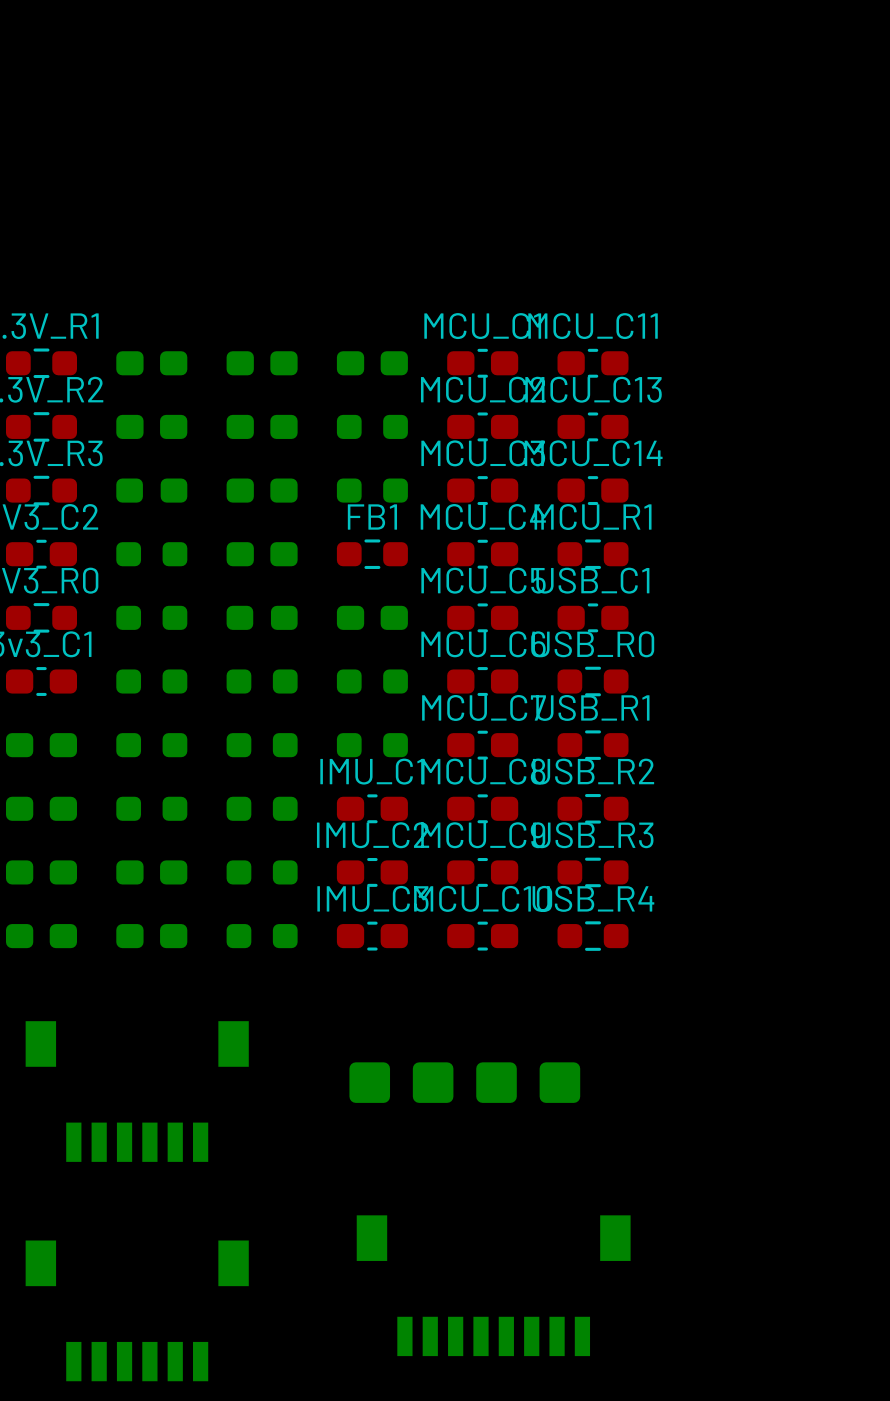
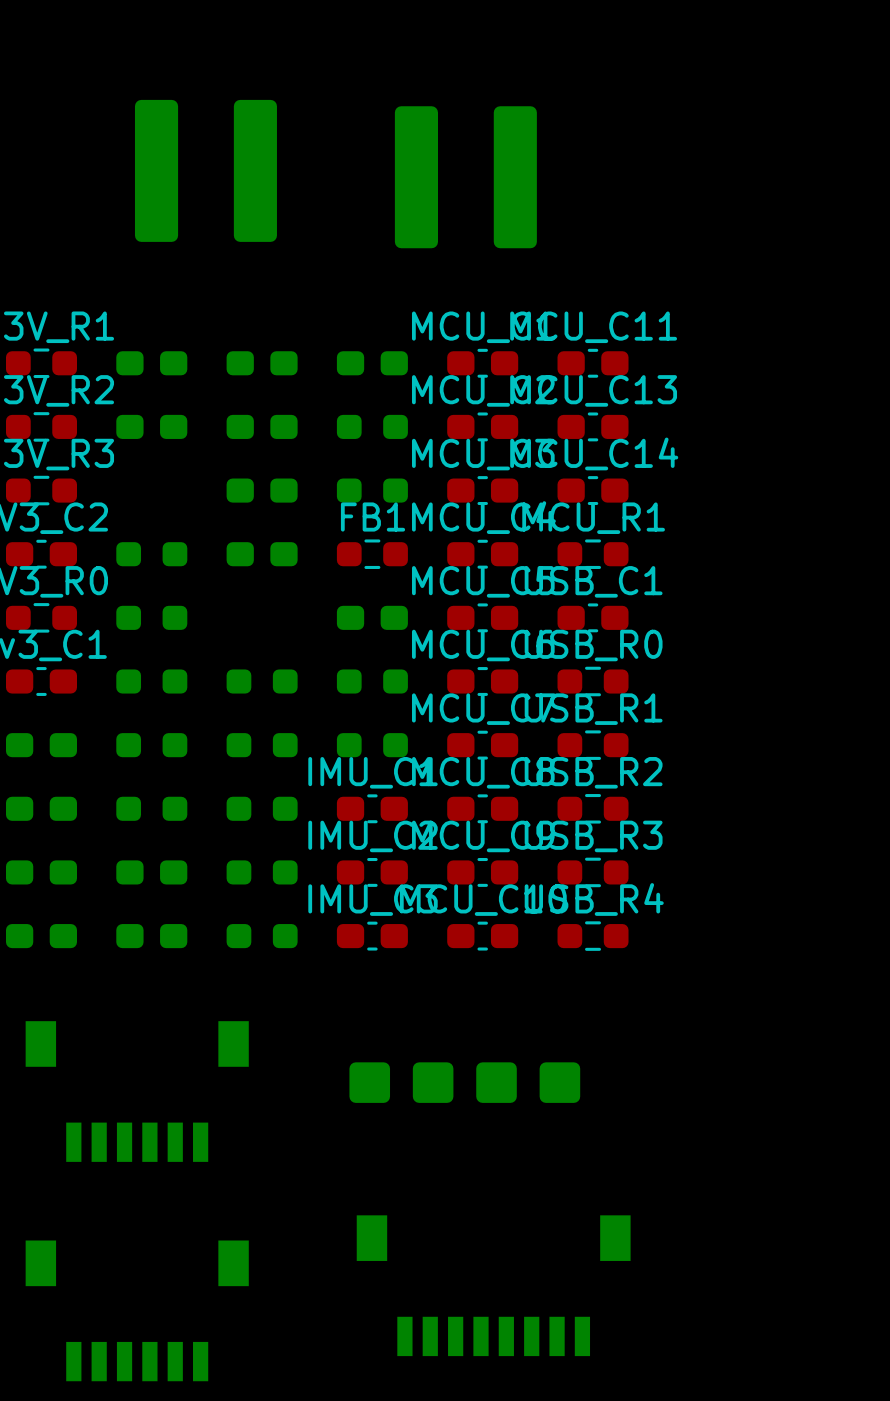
part: none -> (205, 170)
part: none -> (465, 177)
part: (151, 490) -> none
part: (262, 617) -> none

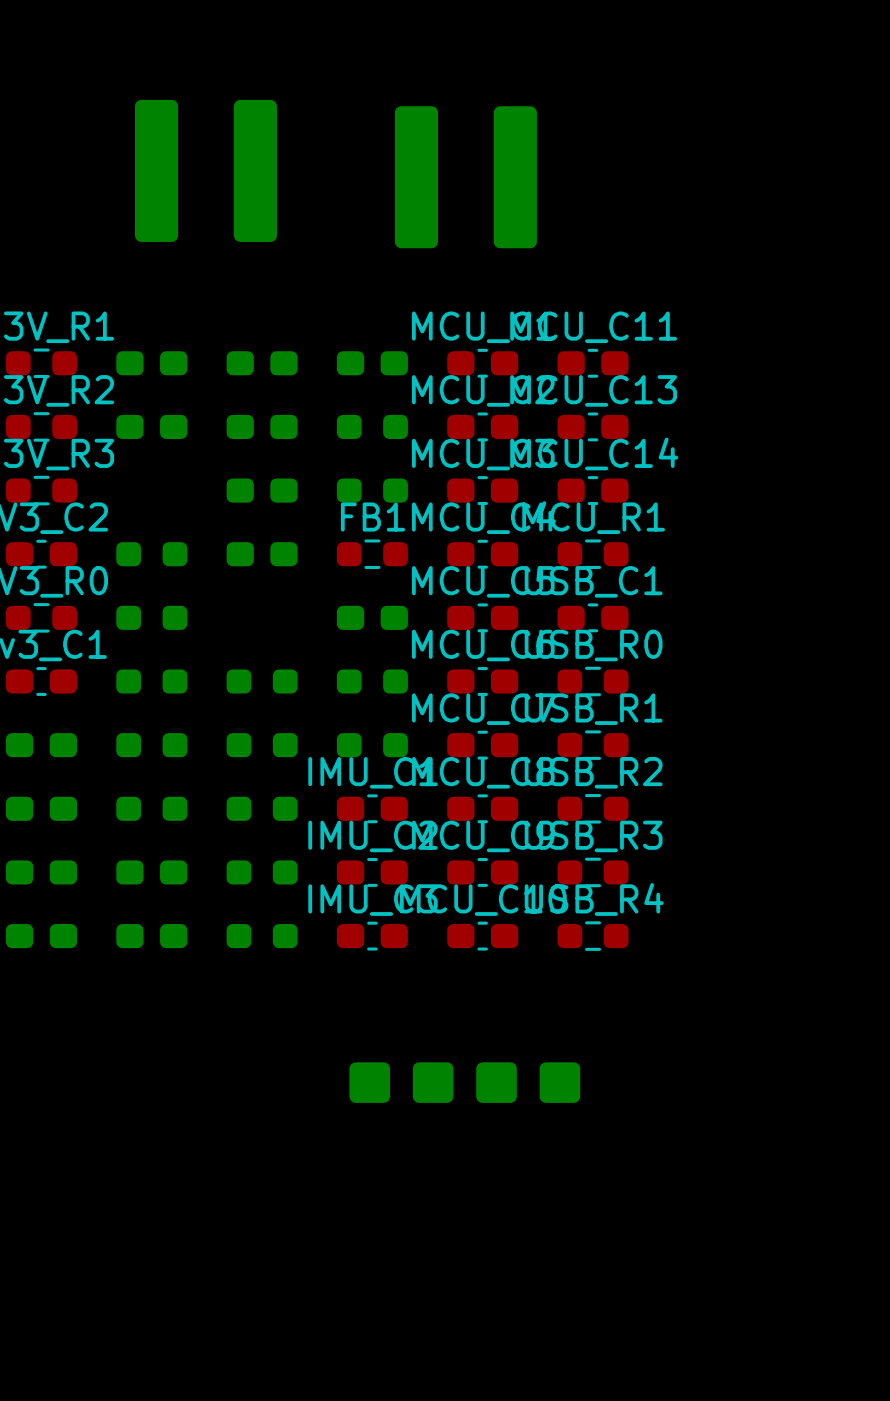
part: (137, 1091) -> none
part: (493, 1285) -> none
part: (137, 1310) -> none

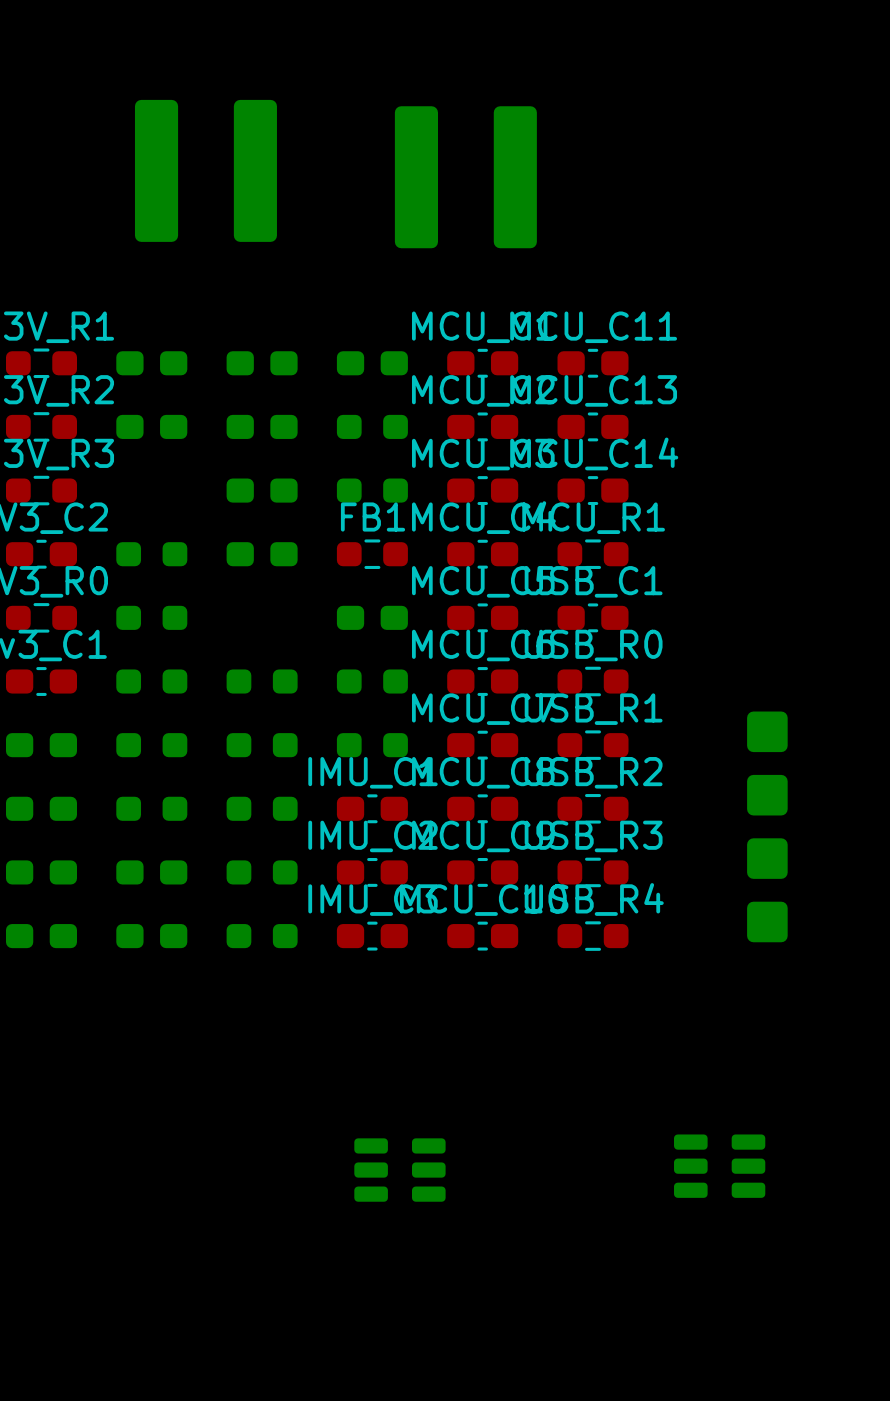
part rotation: 0° (464, 1082) -> 90° clockwise (767, 826)
part position: (464, 1082) -> (767, 826)
part: none -> (719, 1166)
part: none -> (399, 1170)

